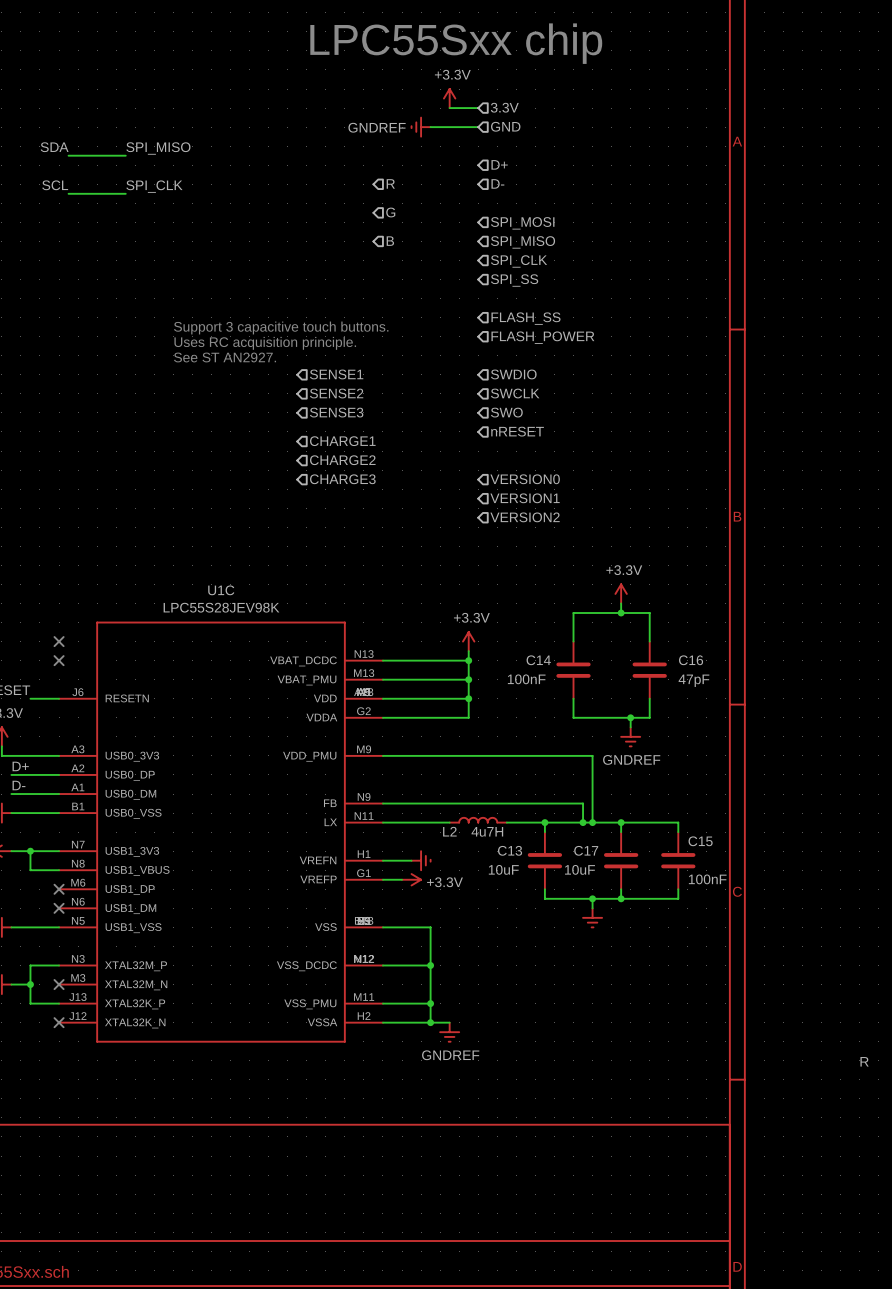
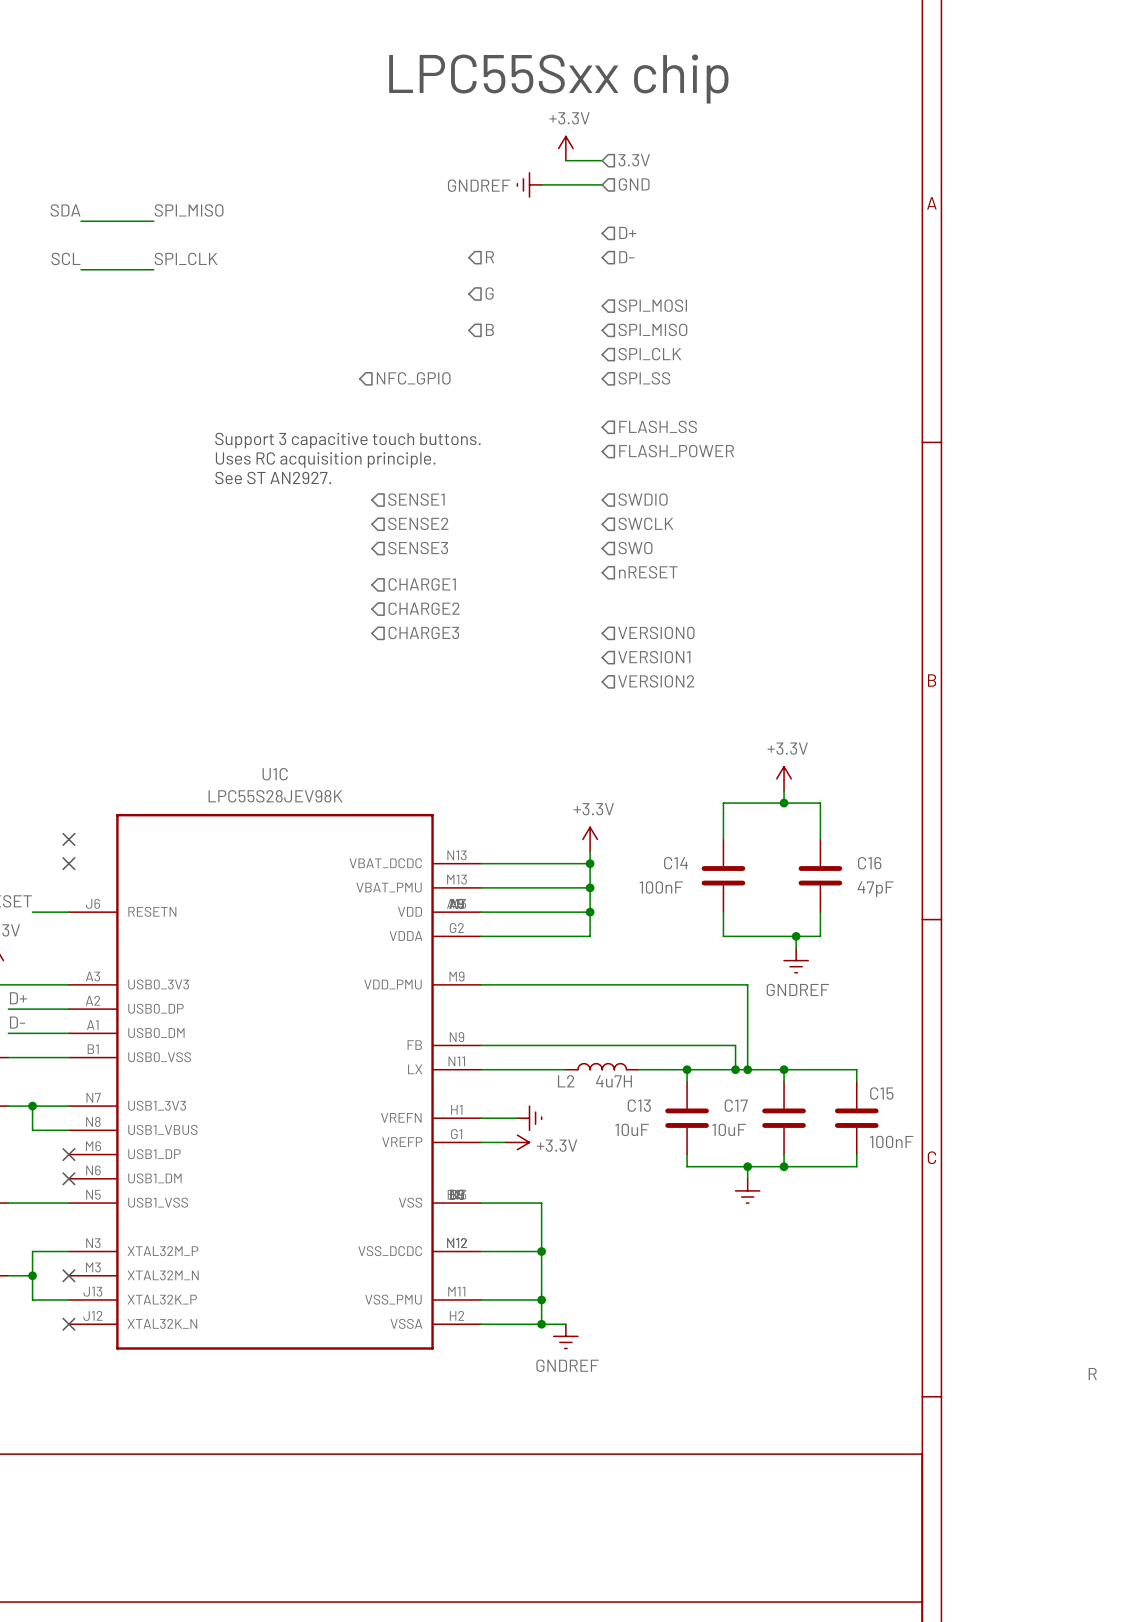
hierarchical label: none -> NFC_GPIO (413, 378)

